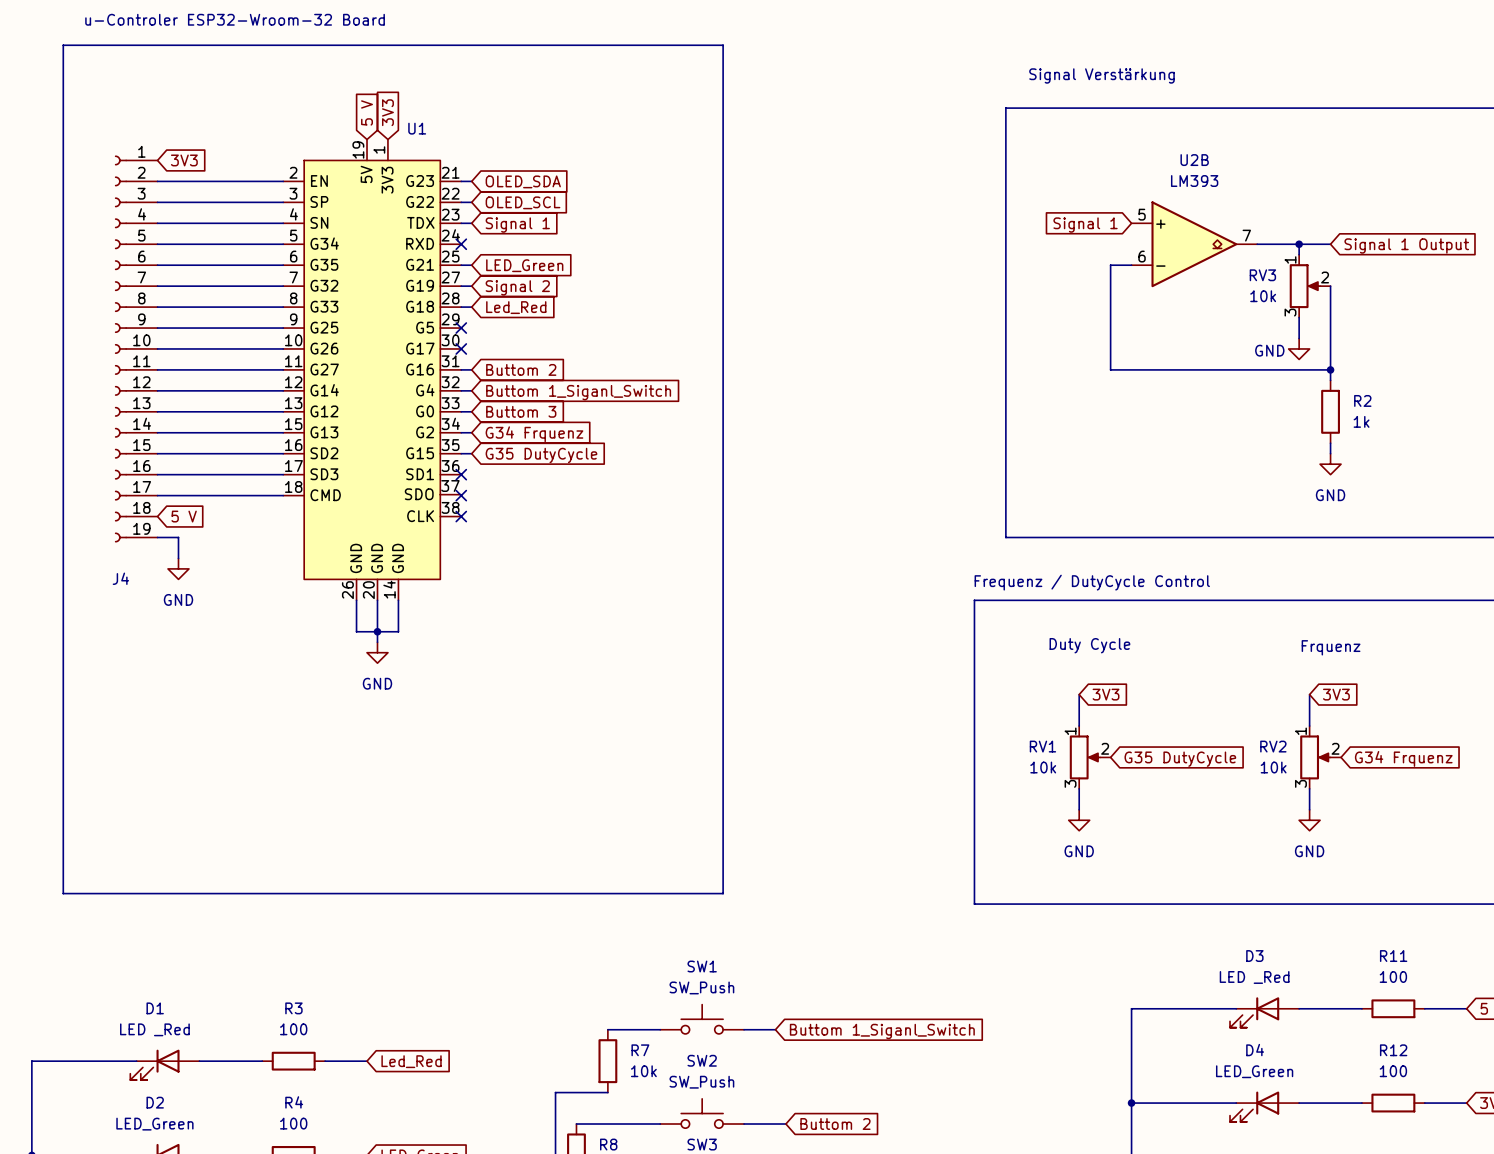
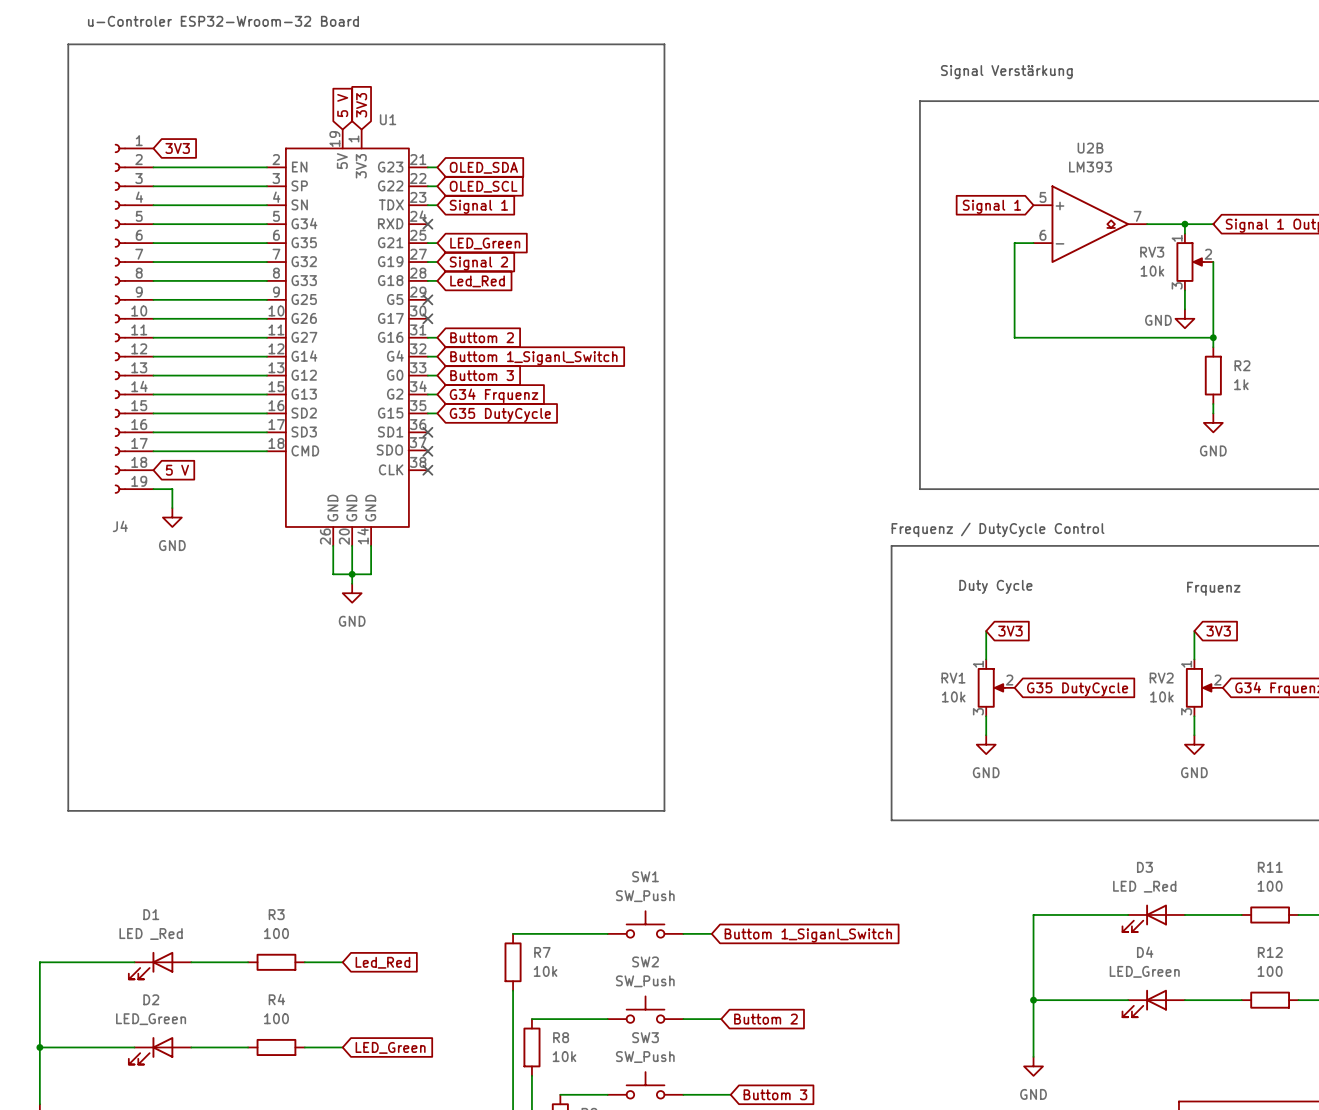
R7 position: (607, 1061) -> (513, 962)
wire: (555, 1092) (607, 1092) -> (513, 933) (560, 933)

